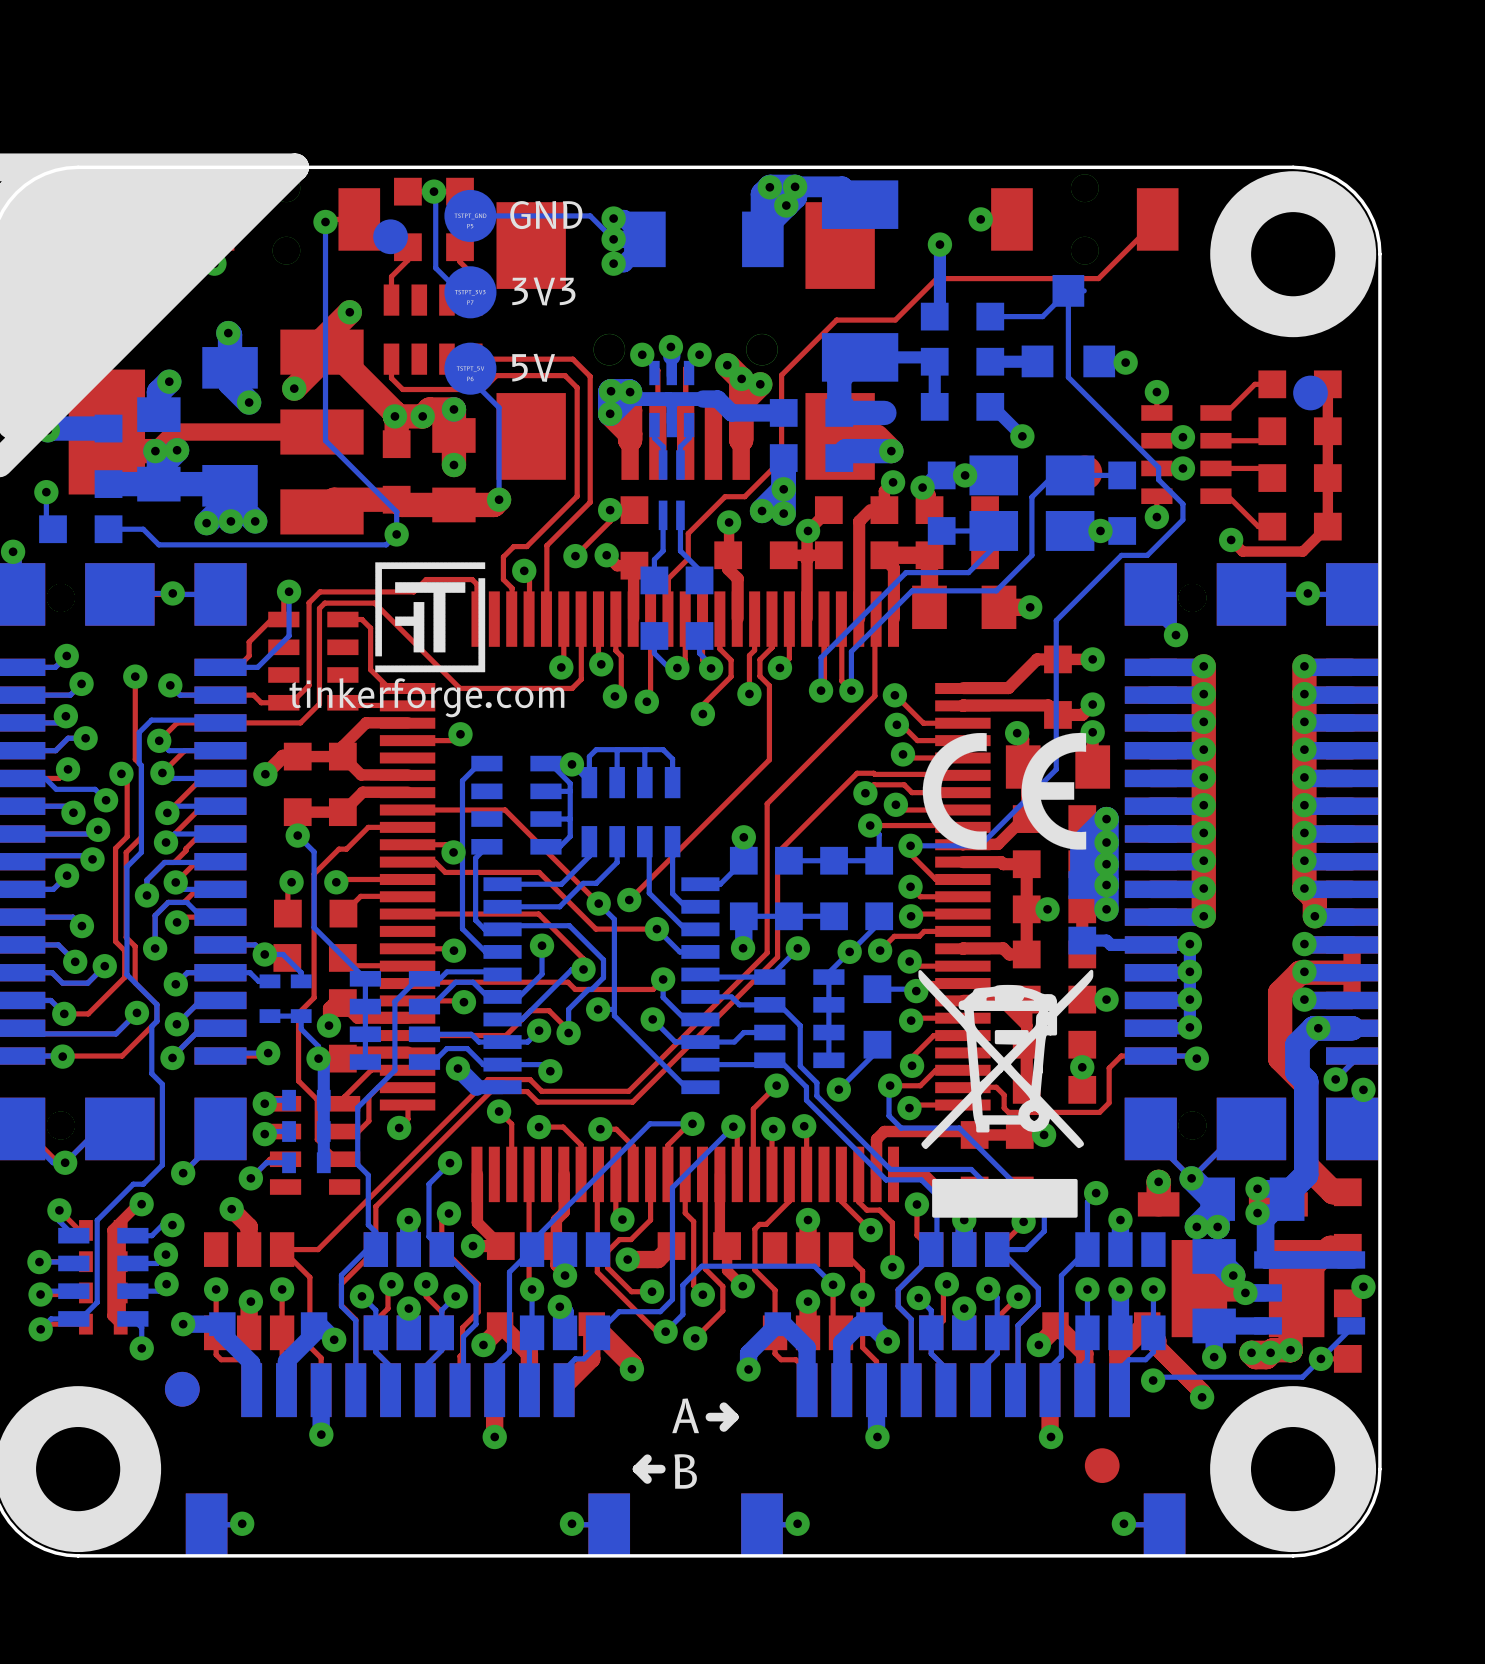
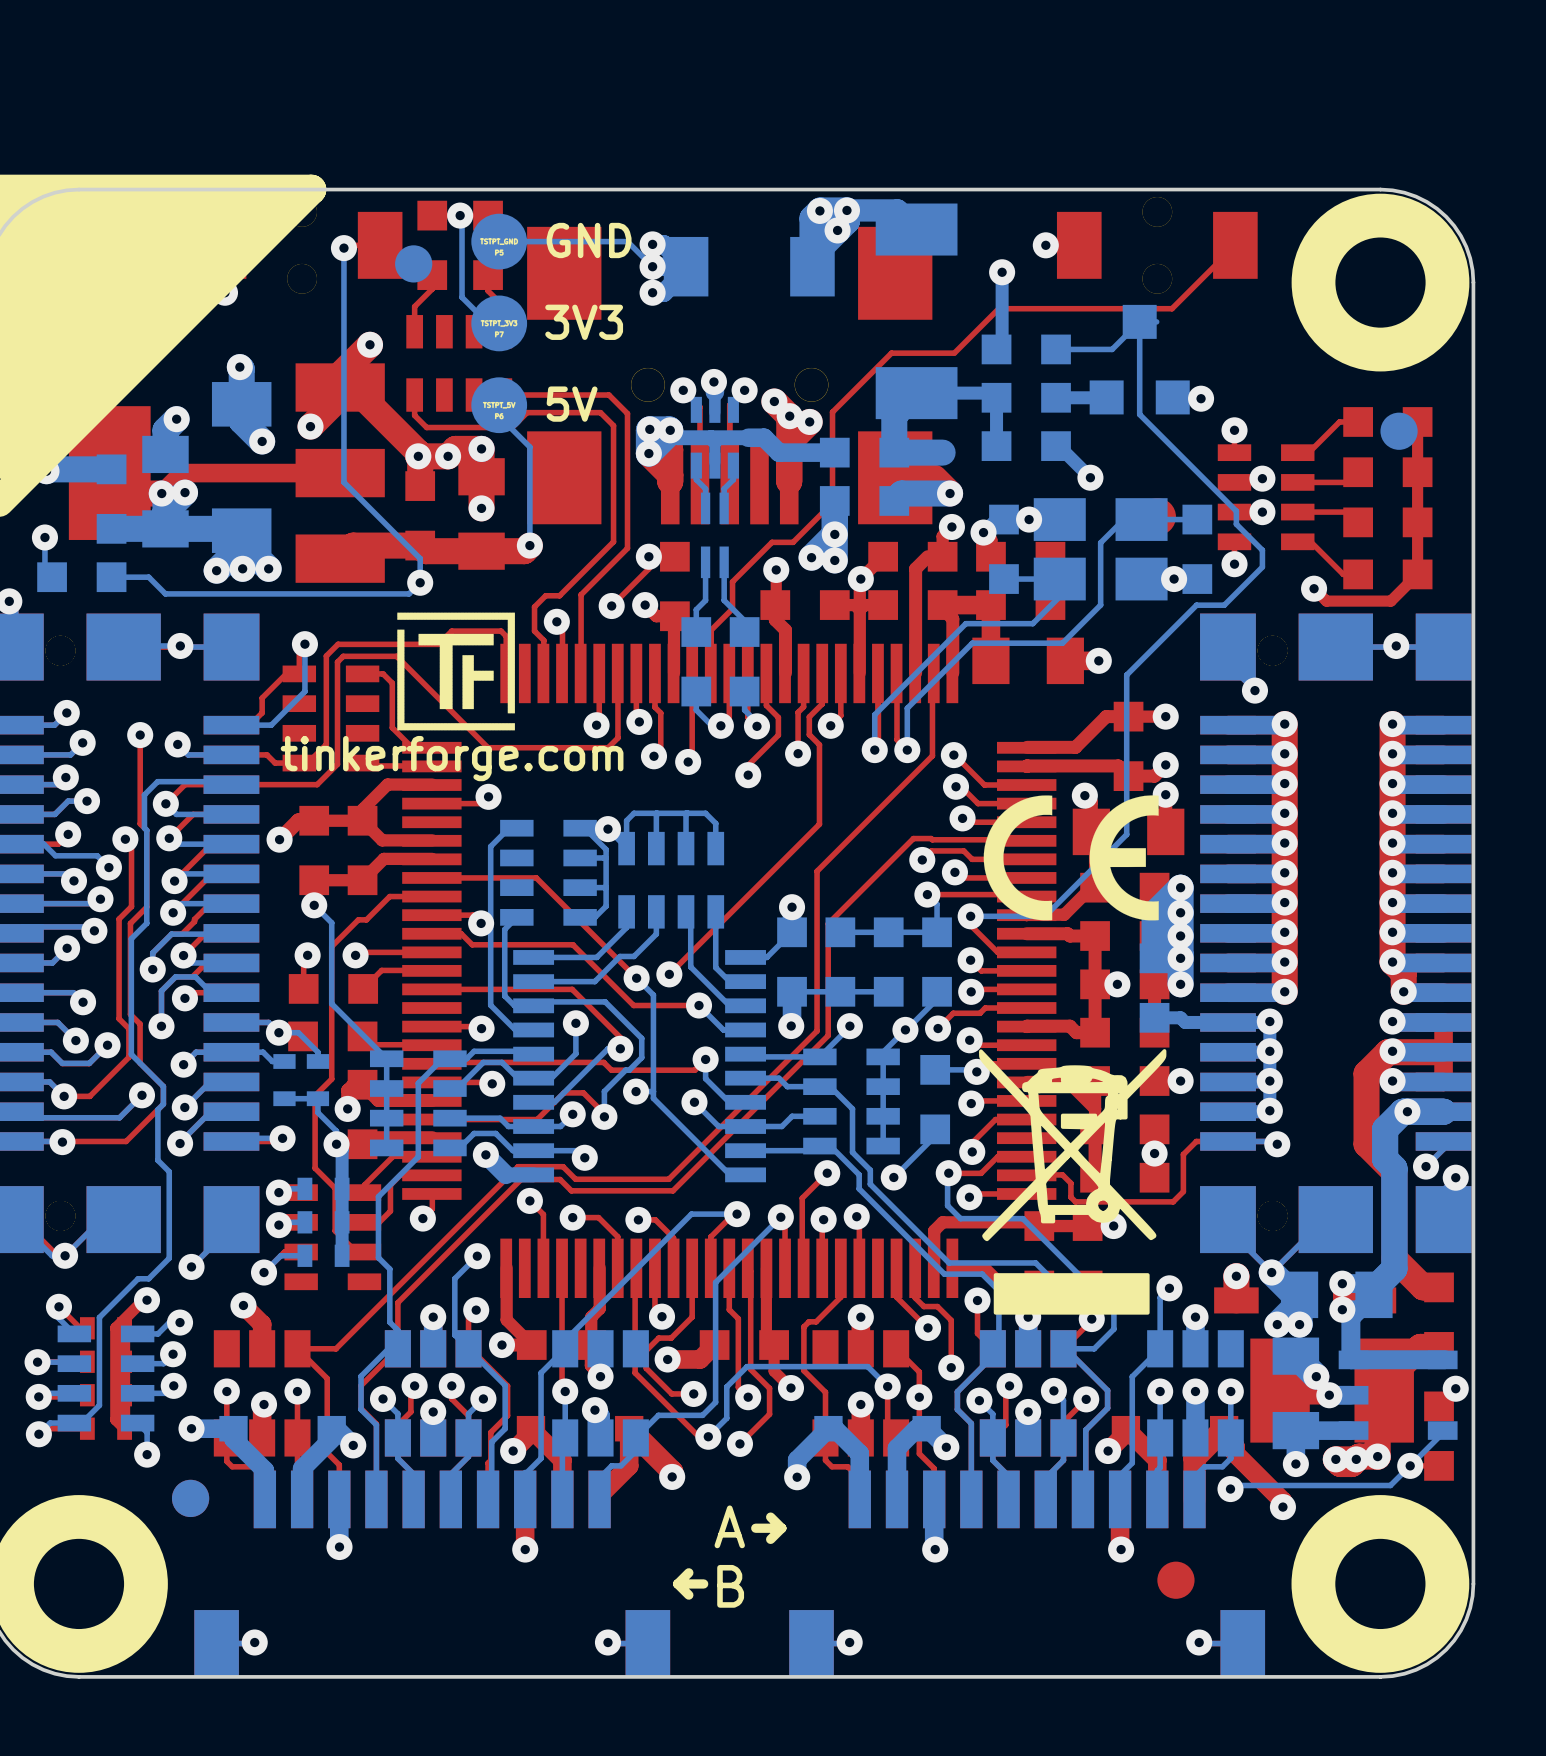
drawing shape: [375, 562, 486, 673] -> [397, 612, 515, 731]

